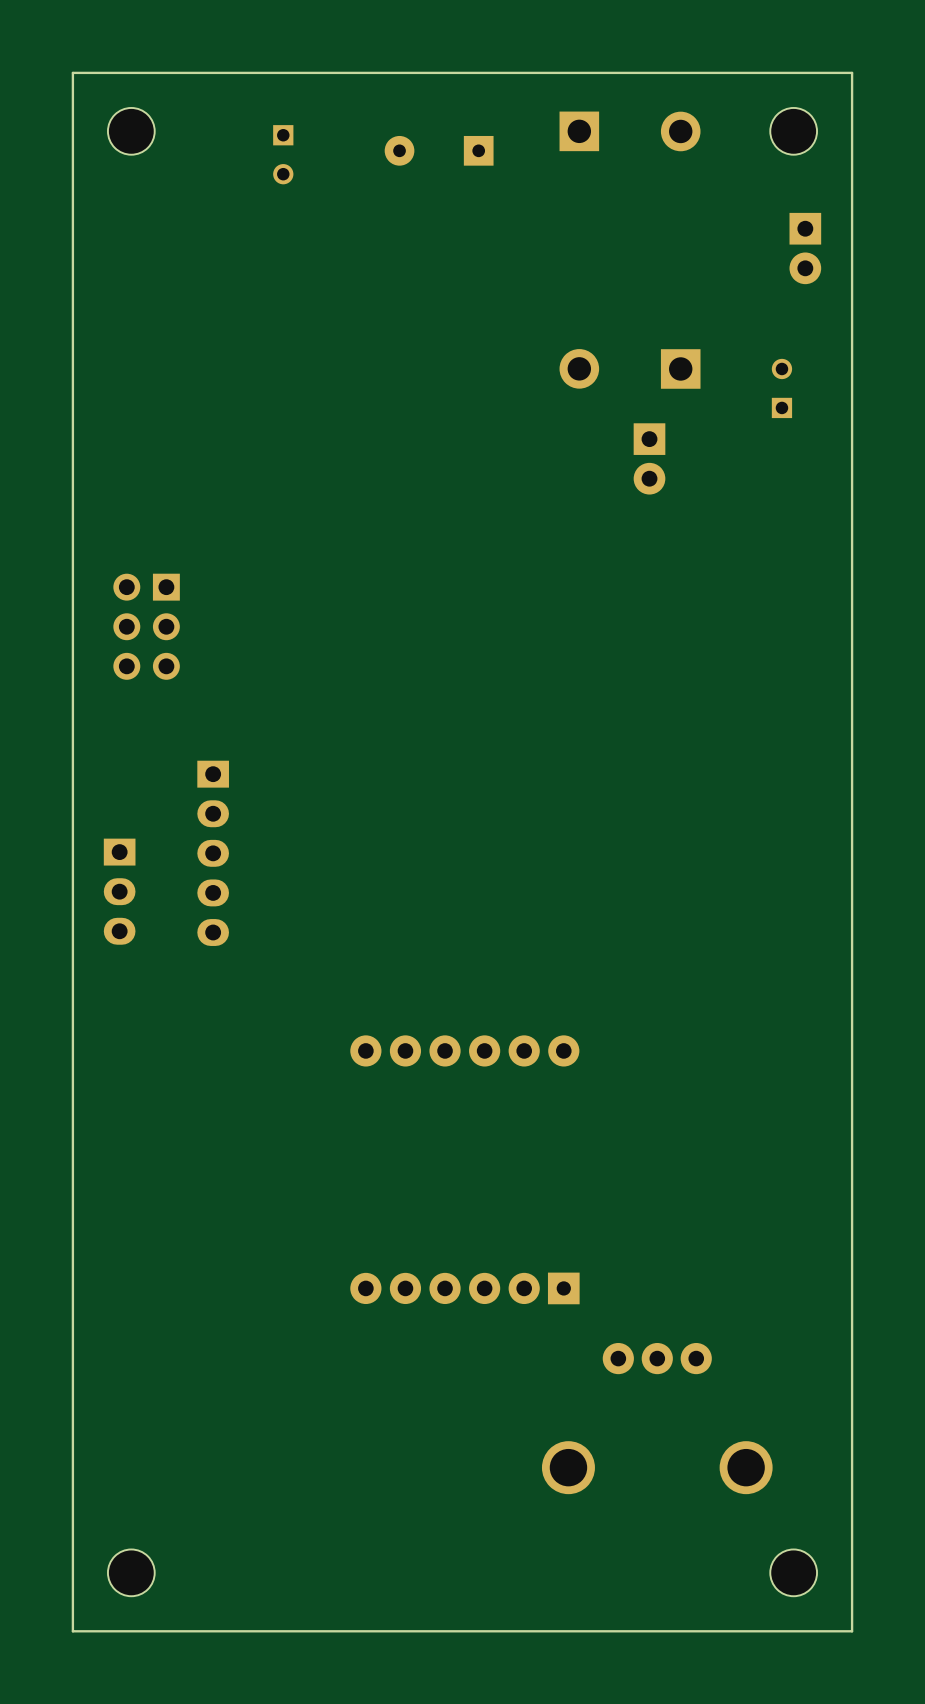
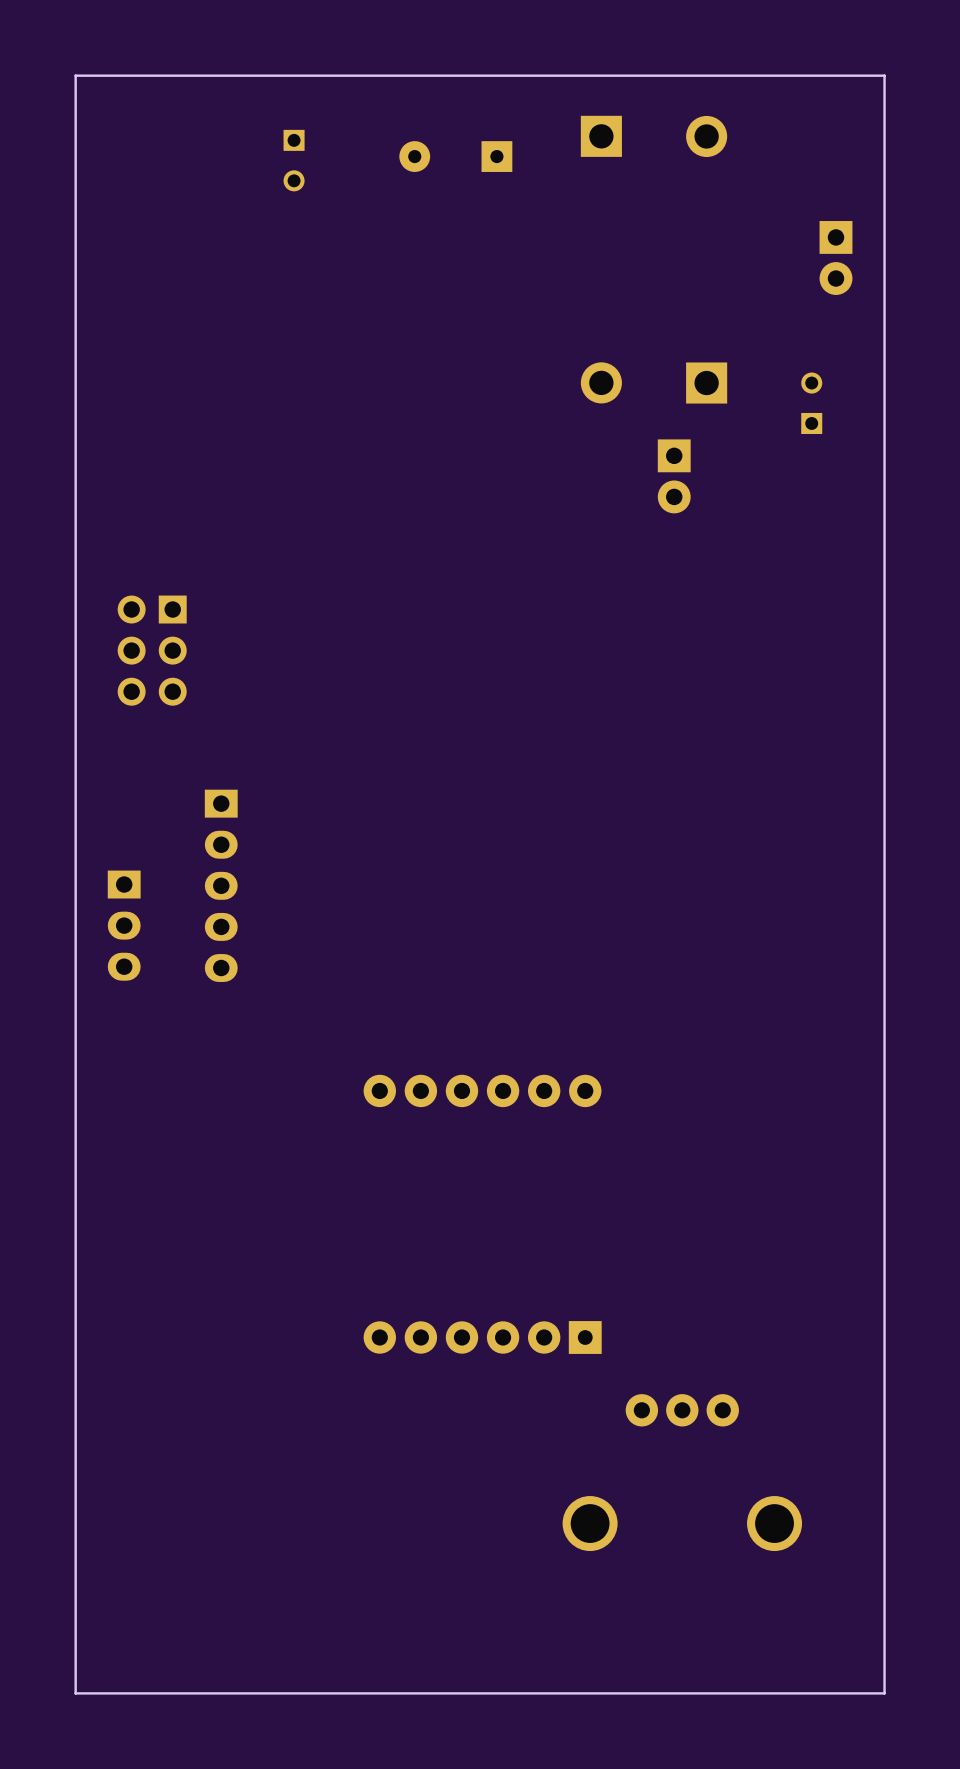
part: (131, 131) -> none
part: (793, 131) -> none
part: (131, 1572) -> none
part: (793, 1572) -> none

